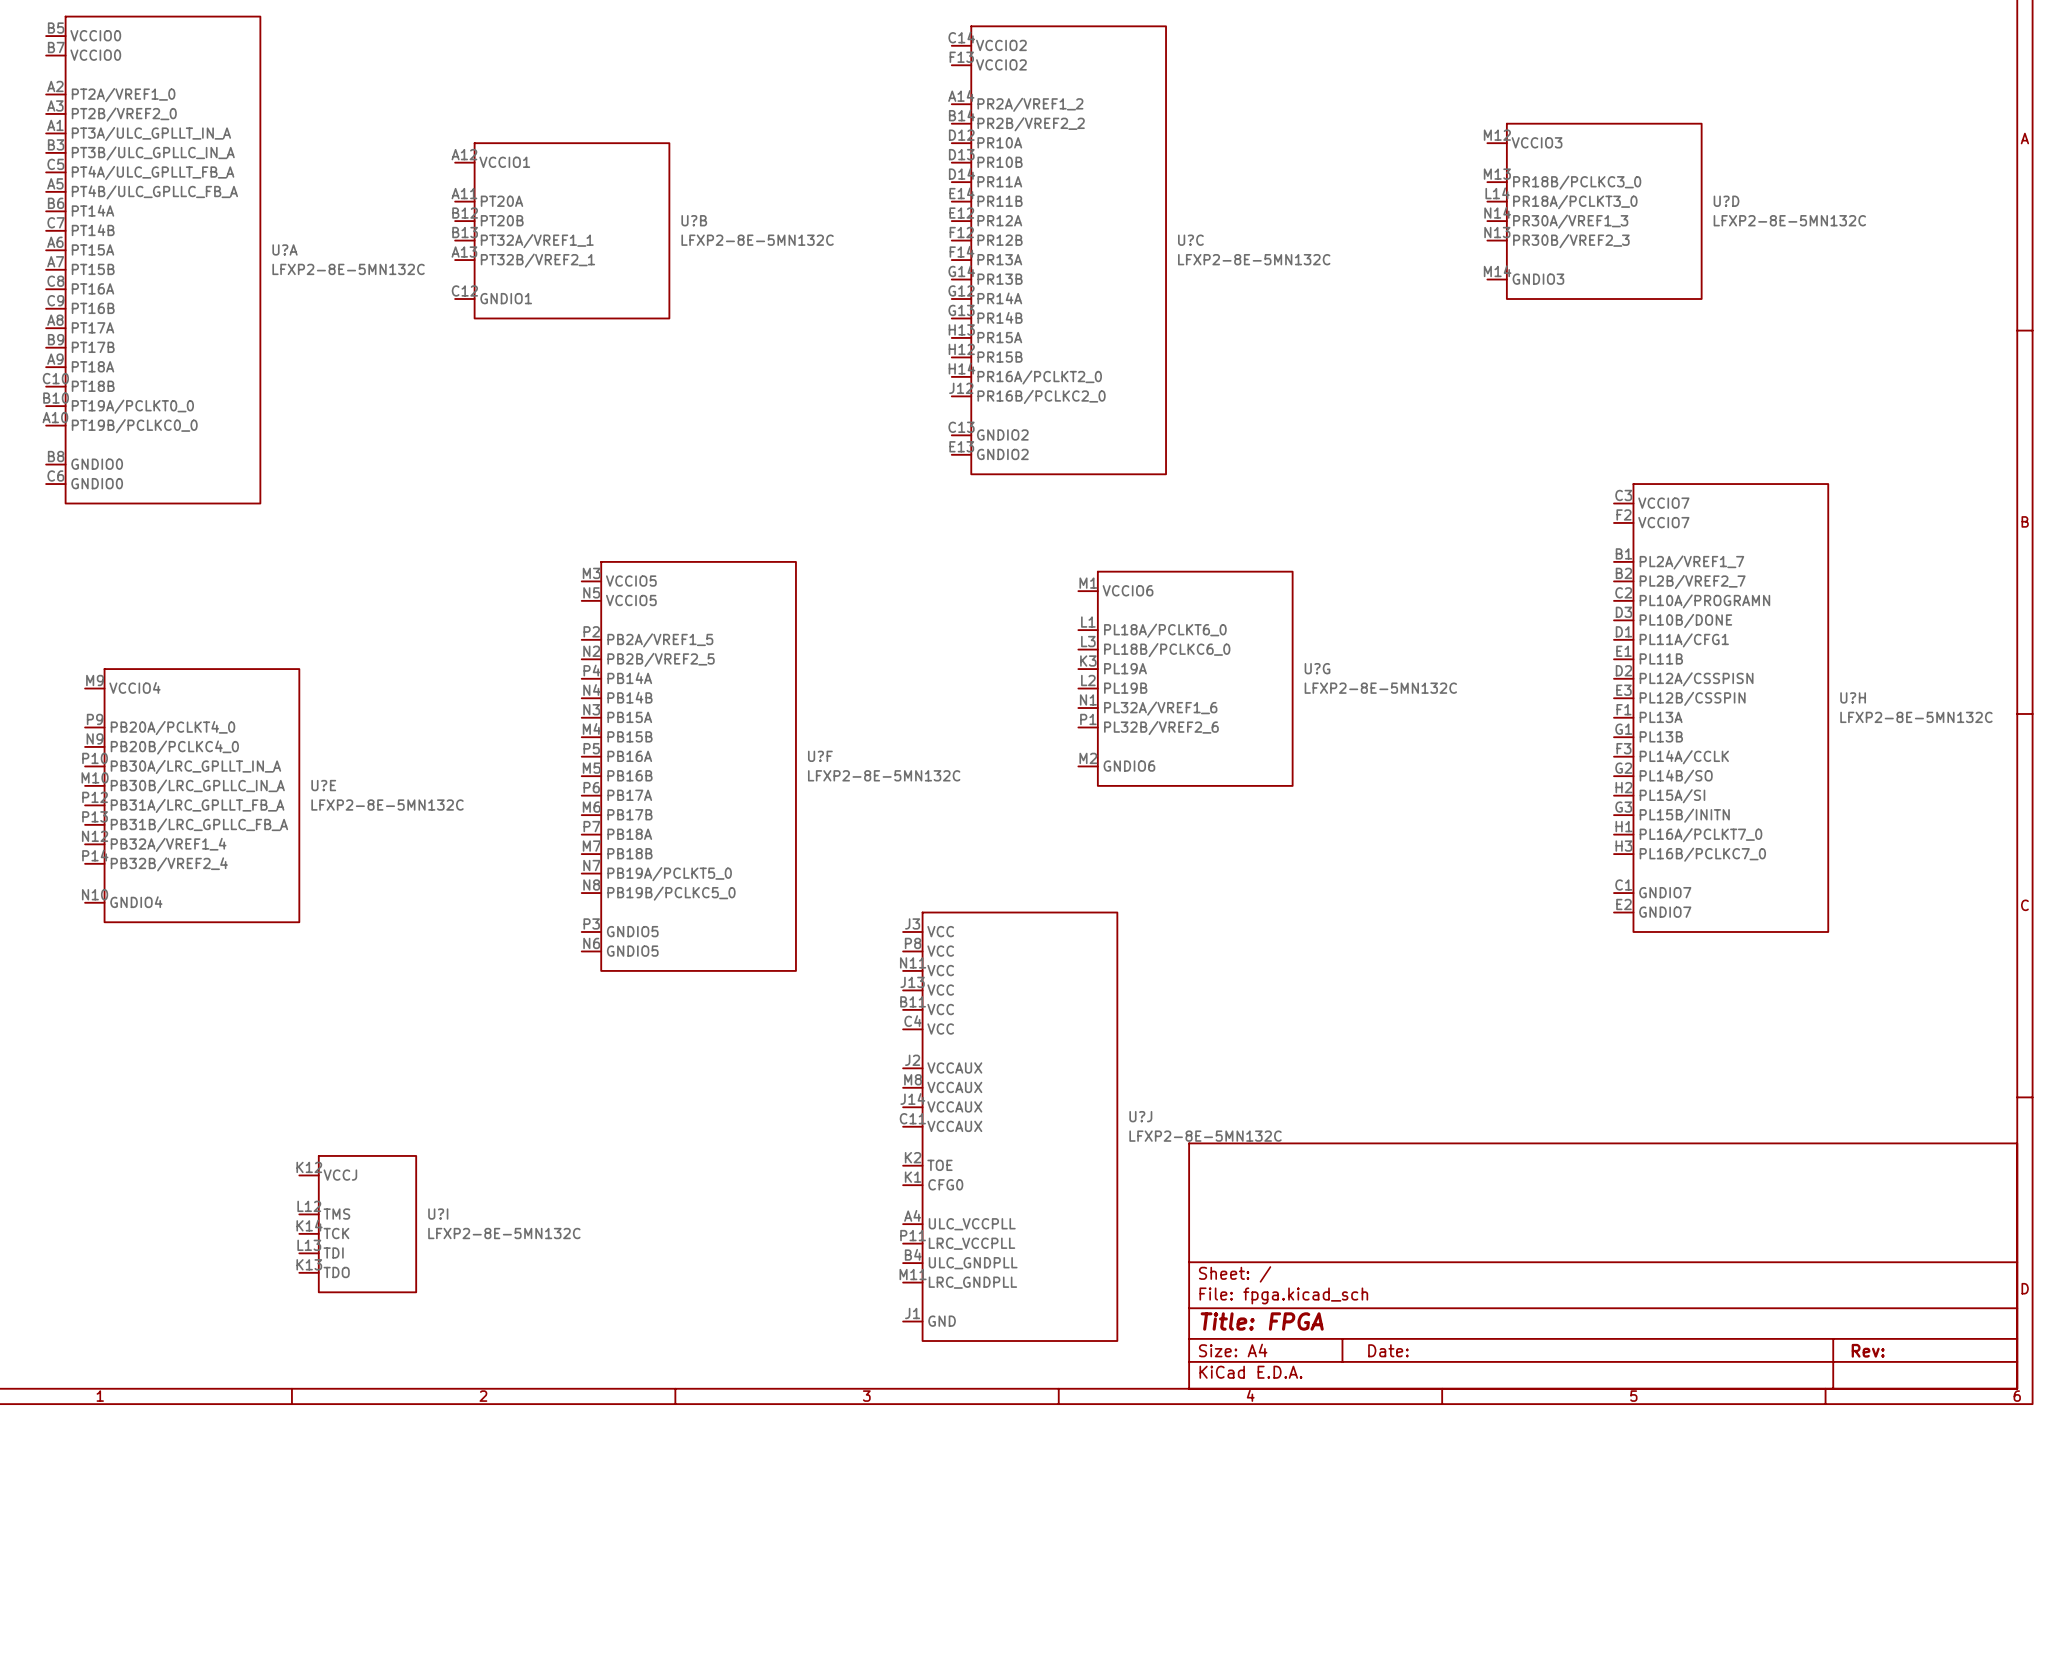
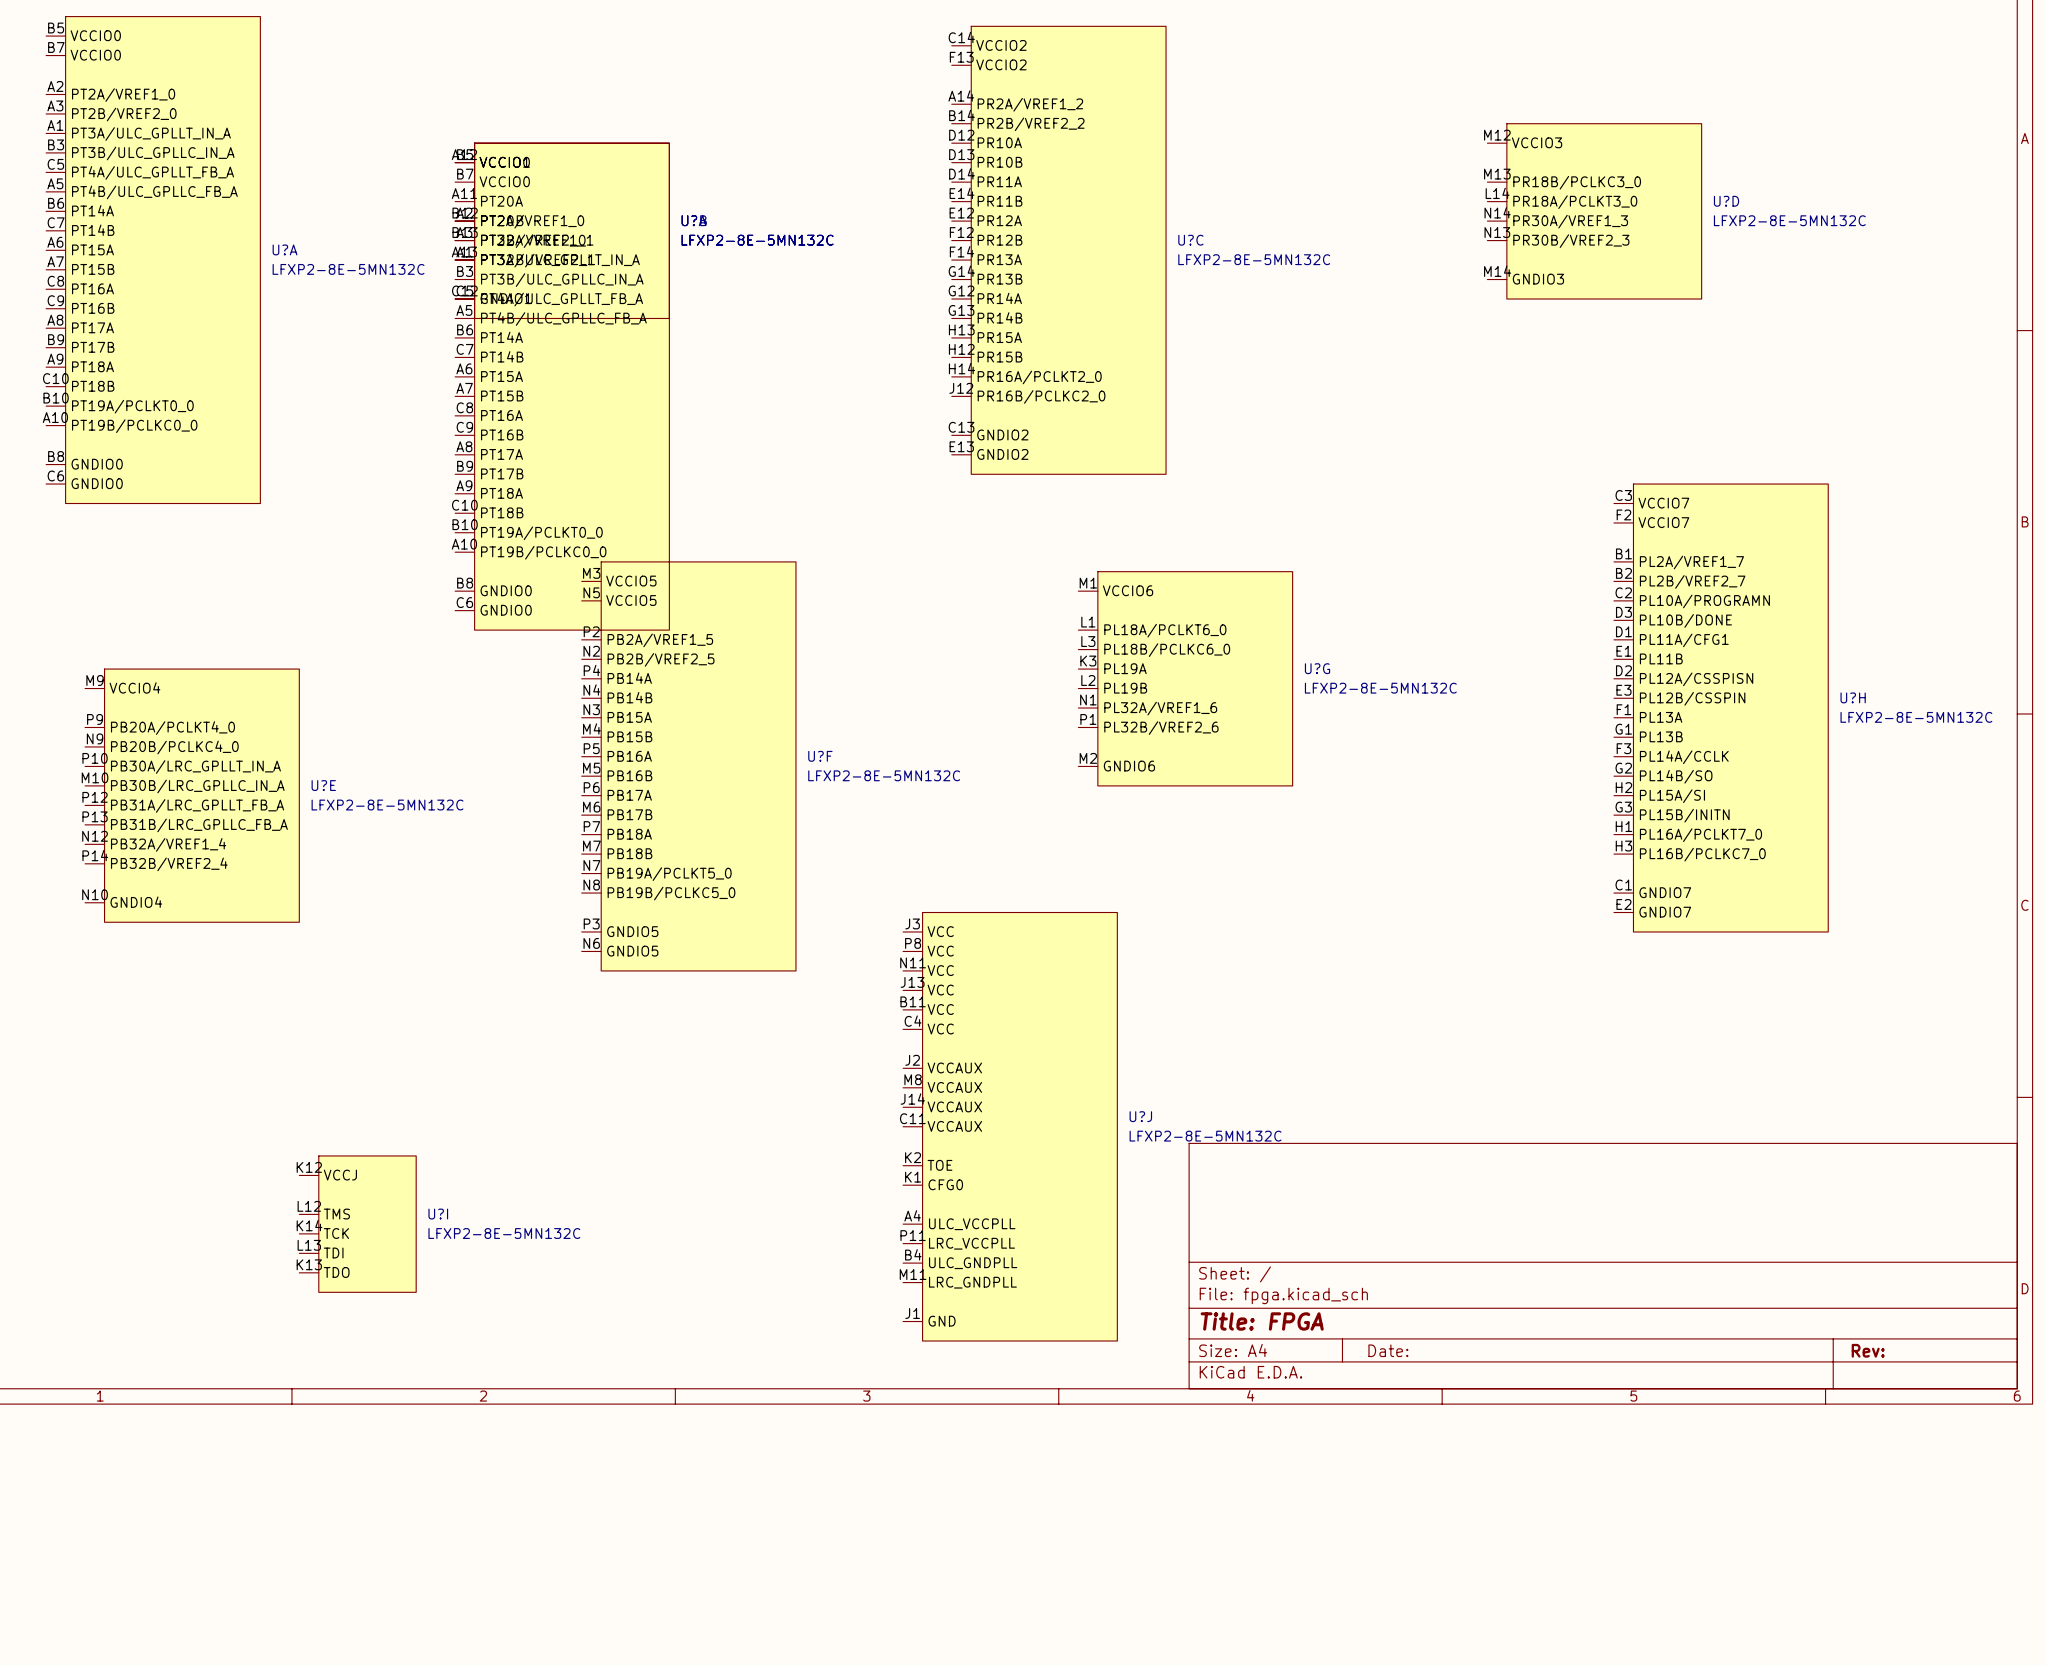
part: none -> LFXP2-8E-5MN132C (562, 386)

